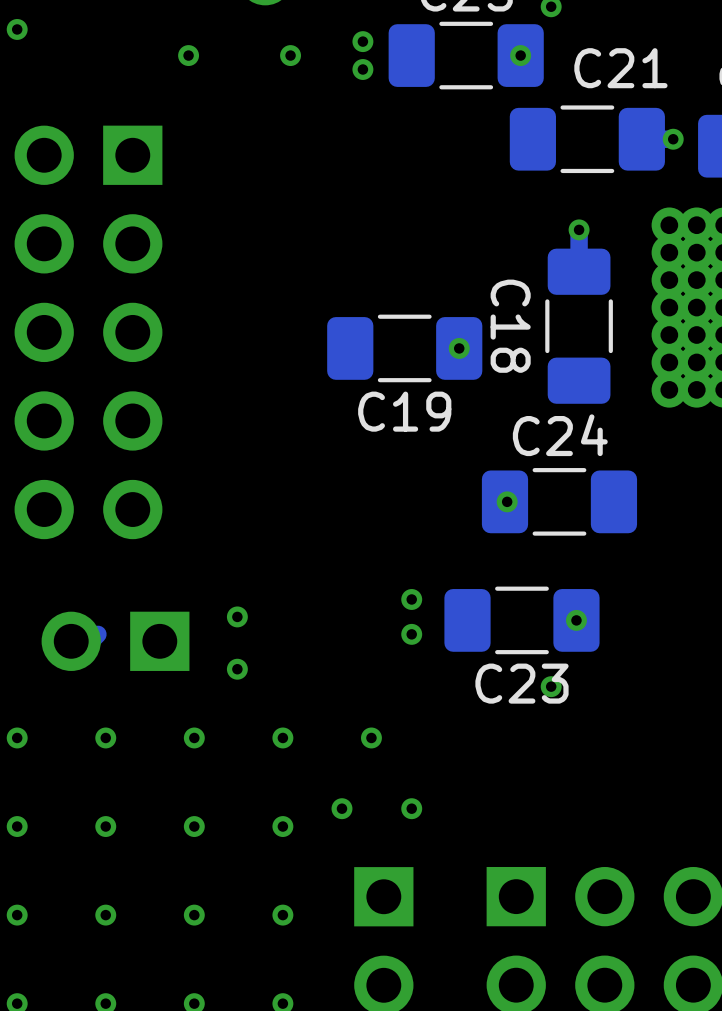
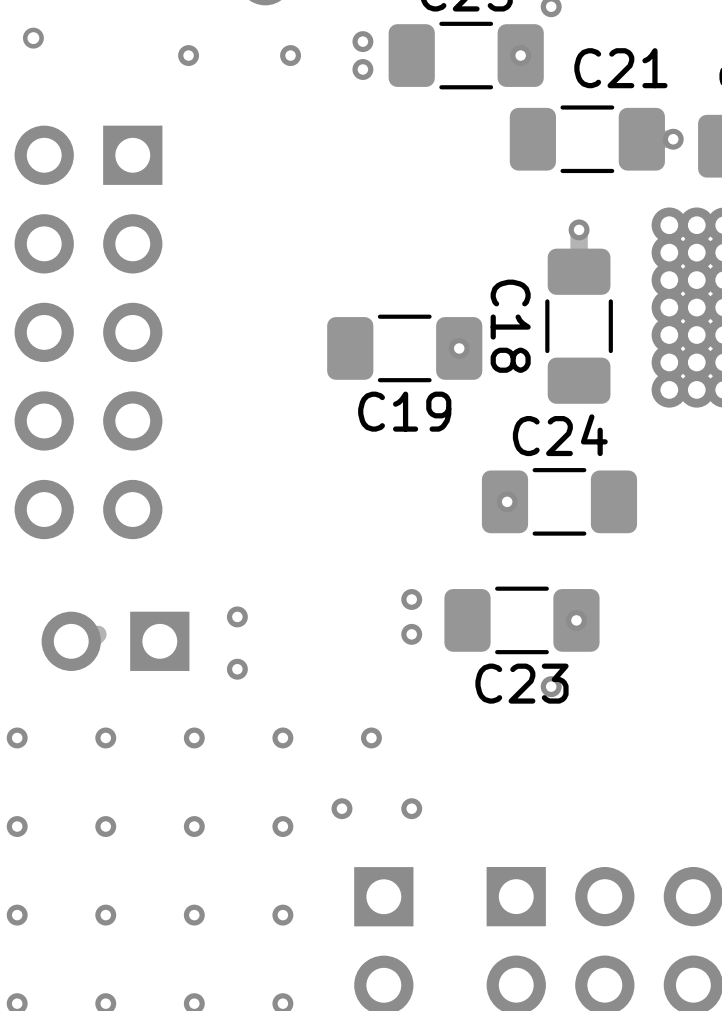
via position: (17, 29) -> (33, 38)

